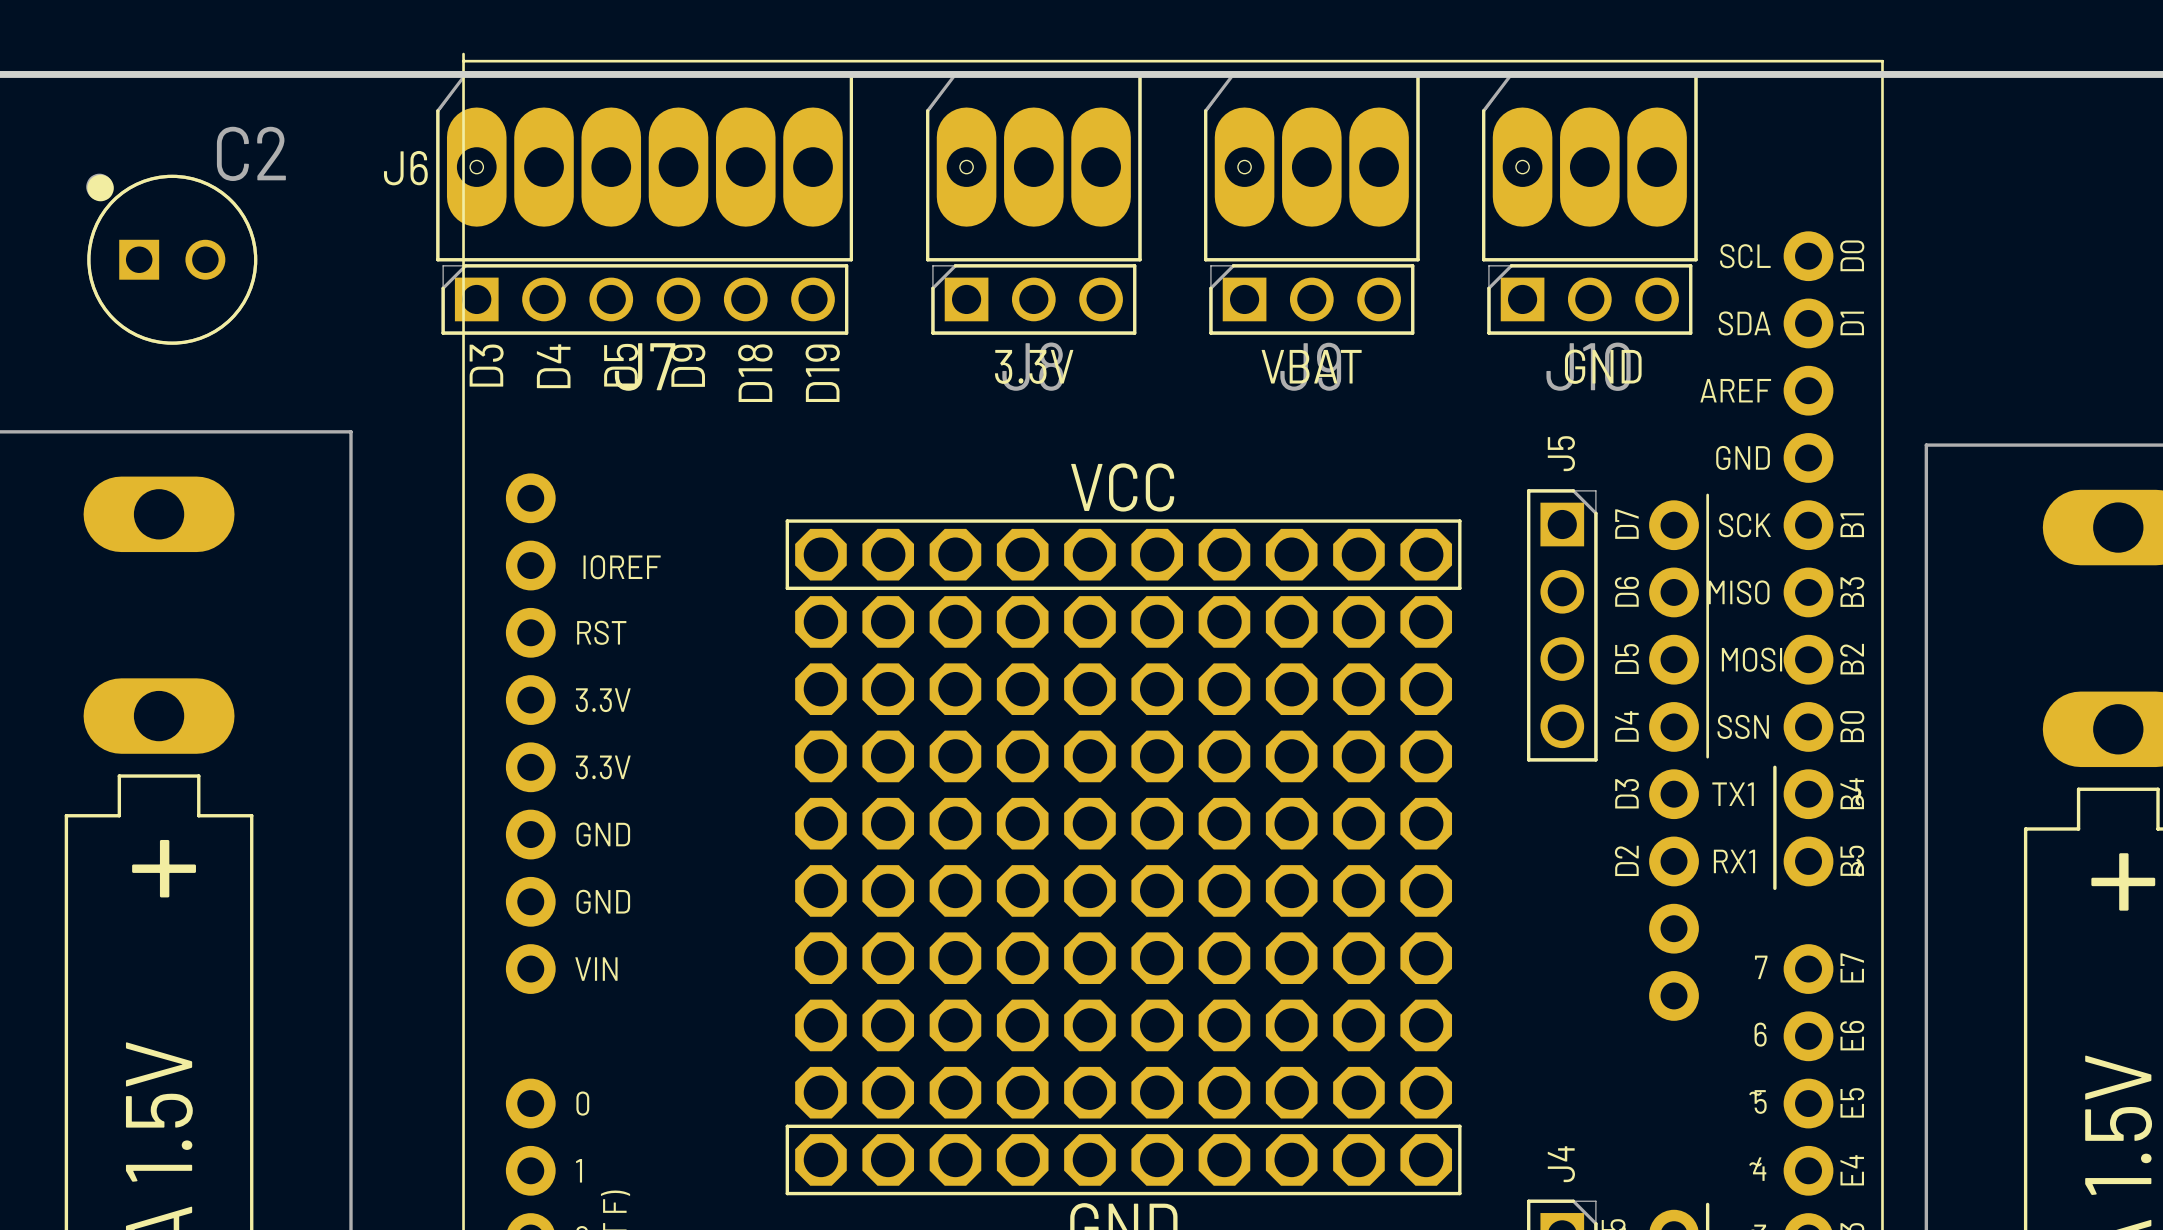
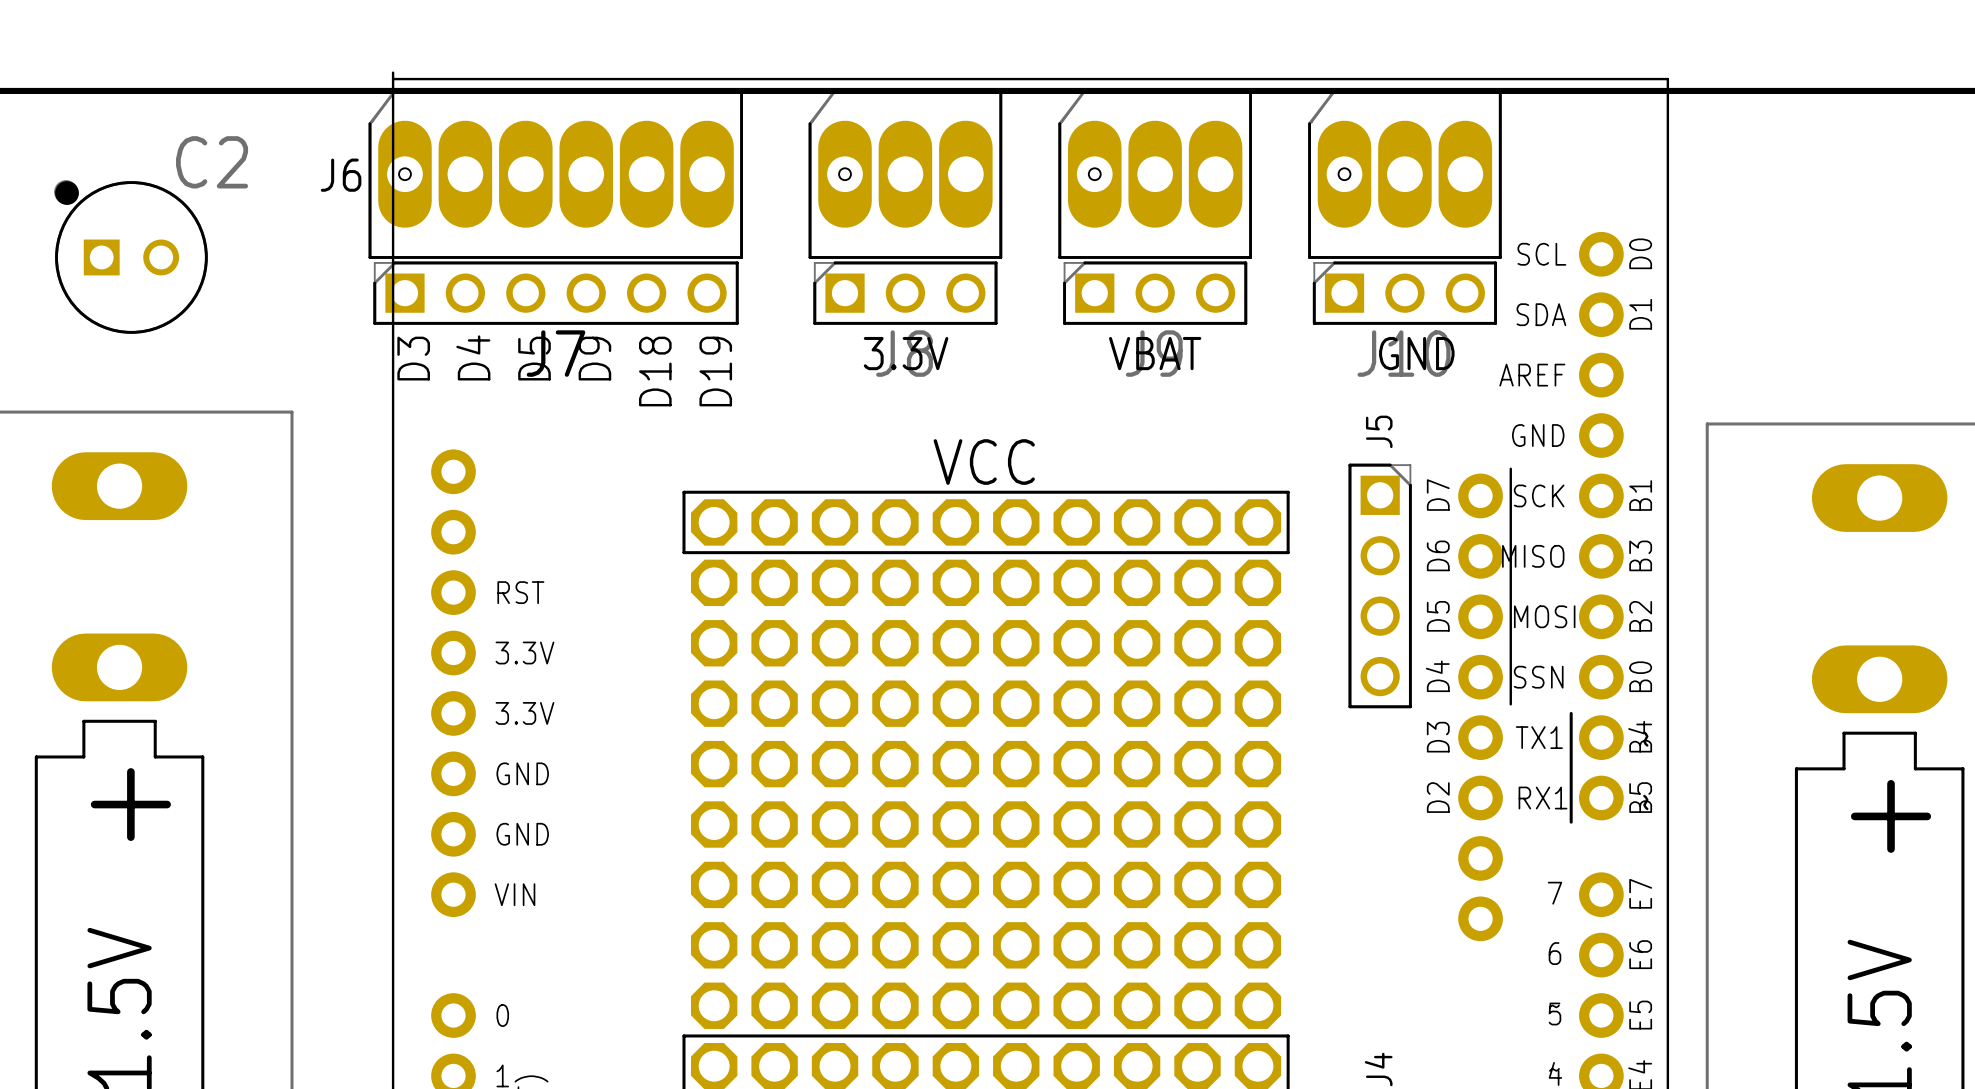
part text: IOREF (622, 567) -> none

